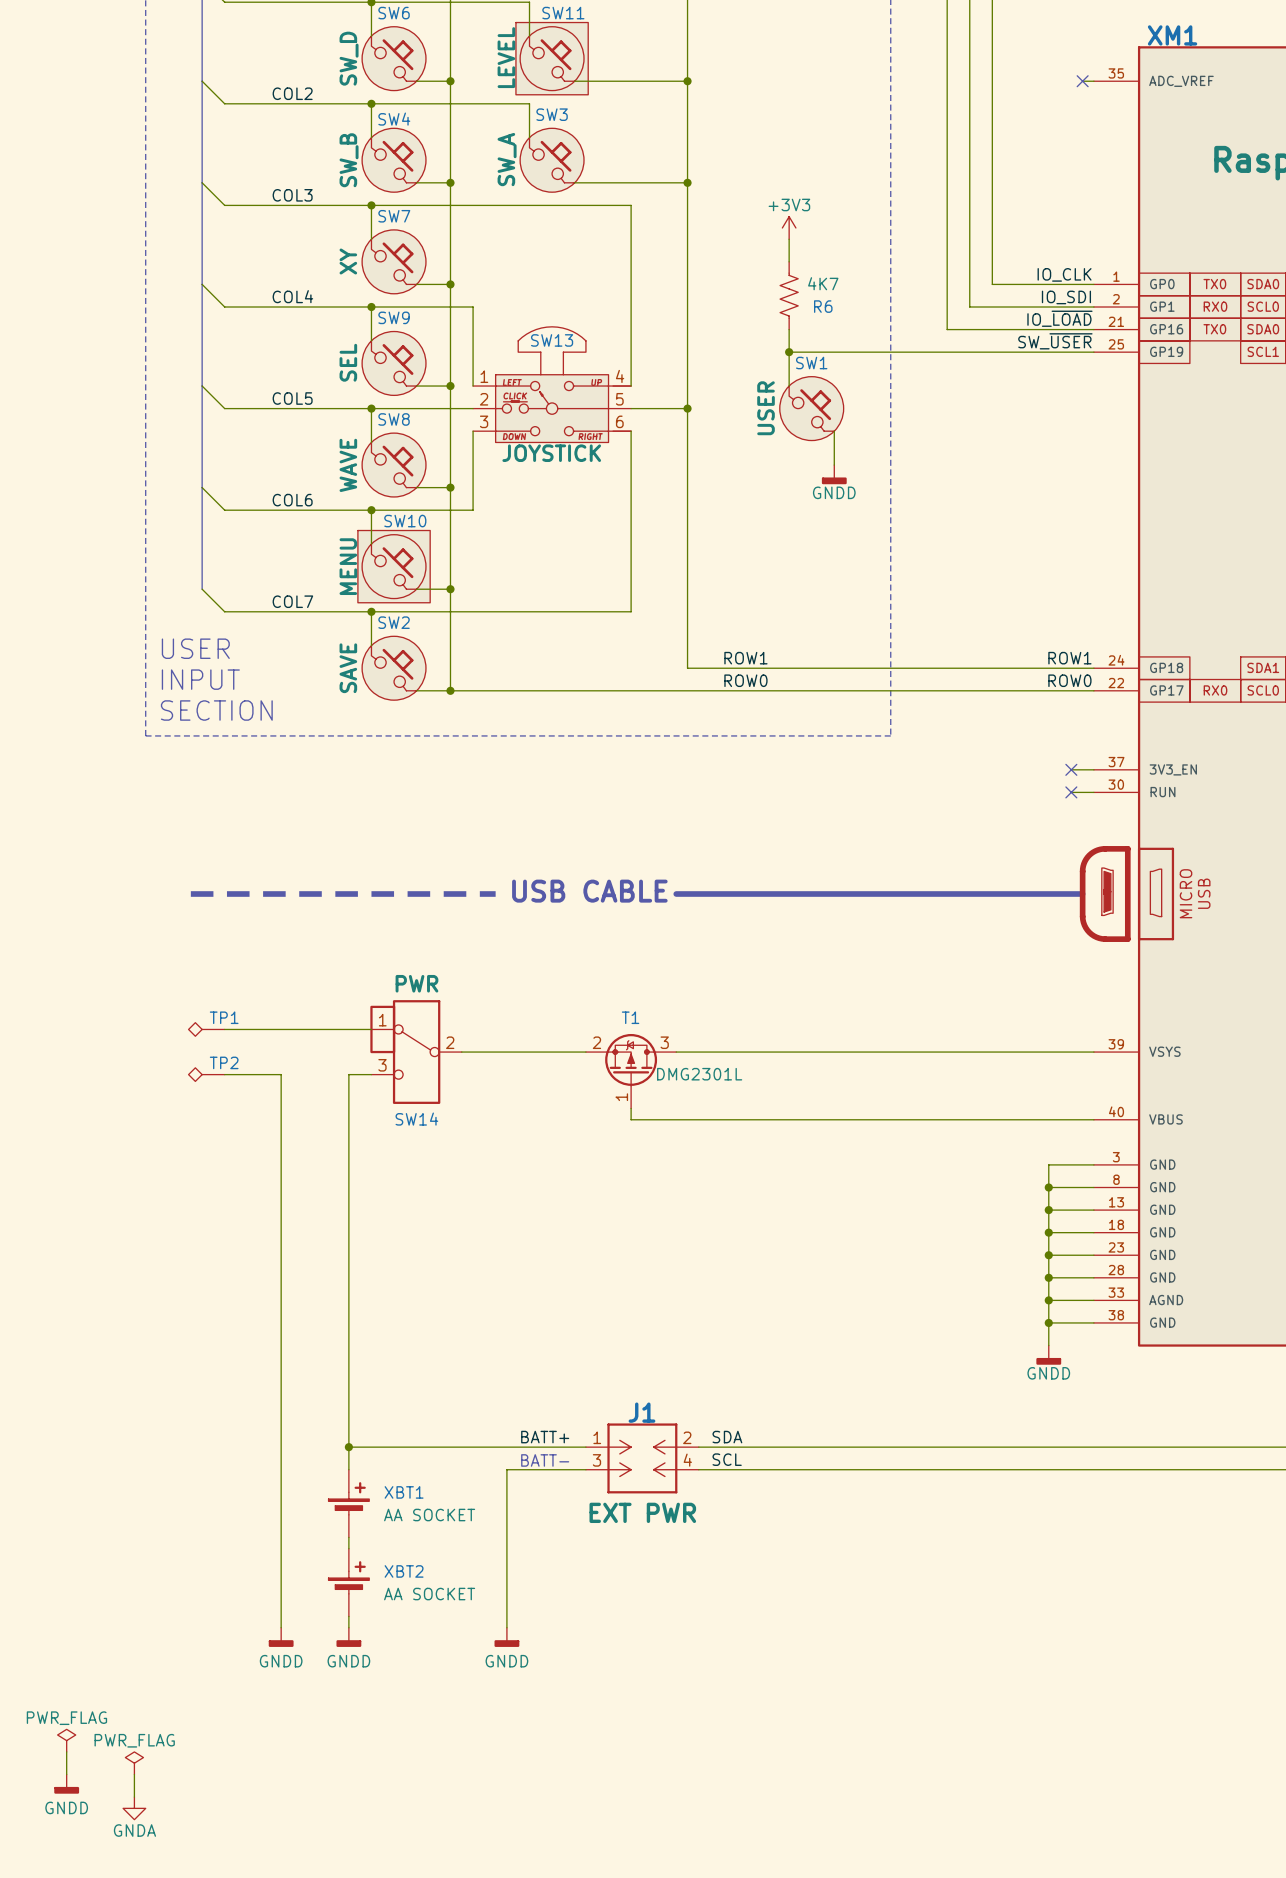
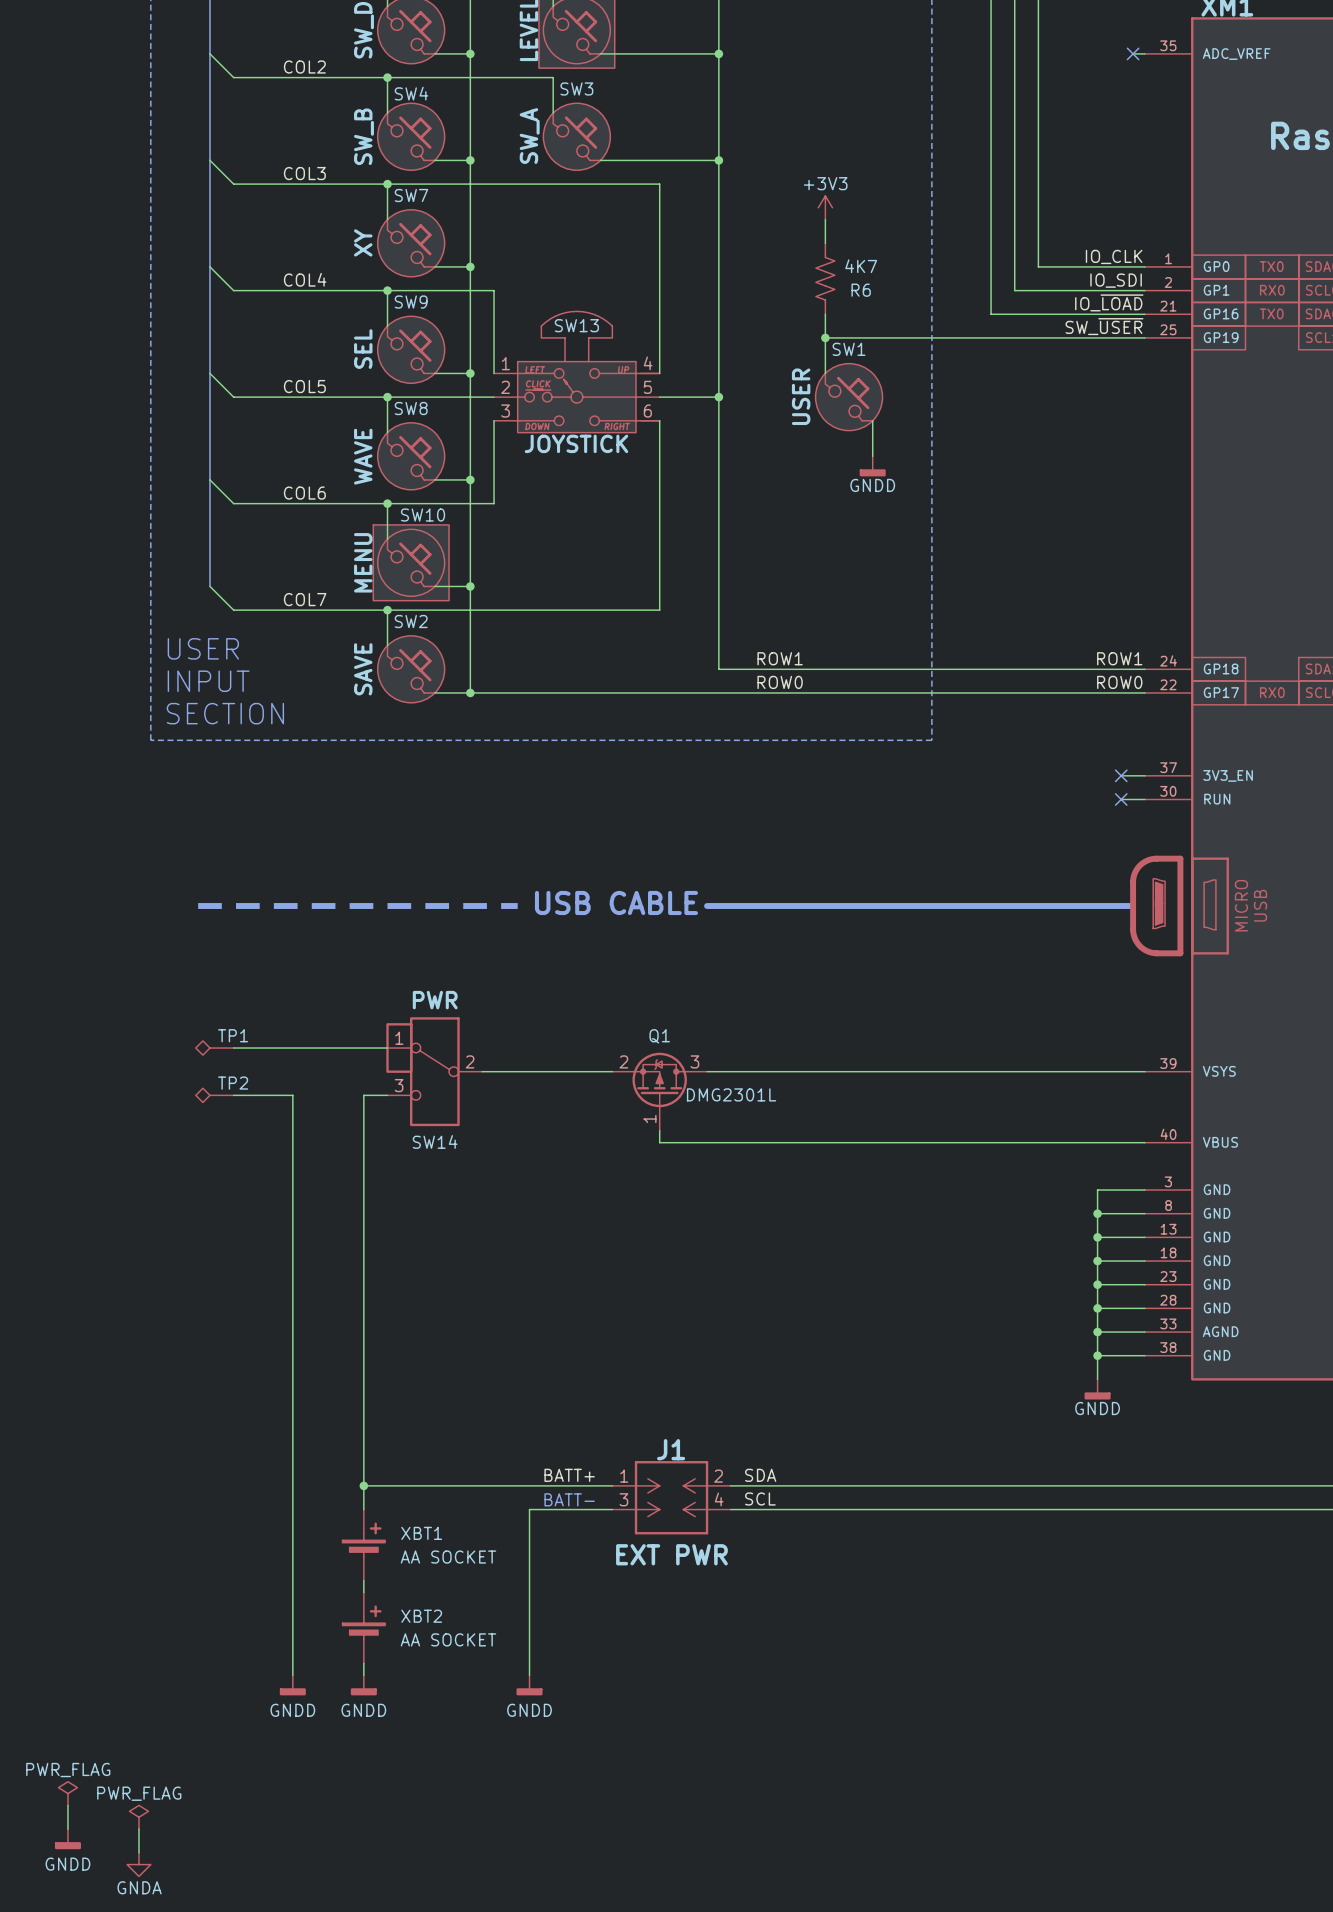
T1 name: T1 (630, 1017) -> Q1 (659, 1036)

